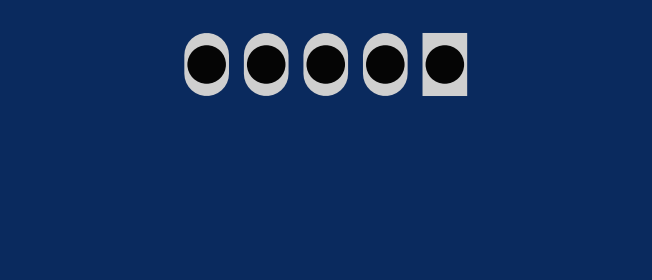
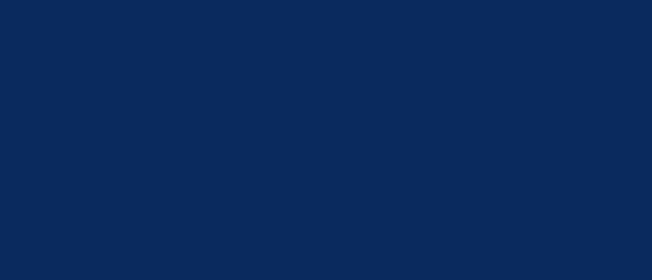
part: (325, 64) -> none

